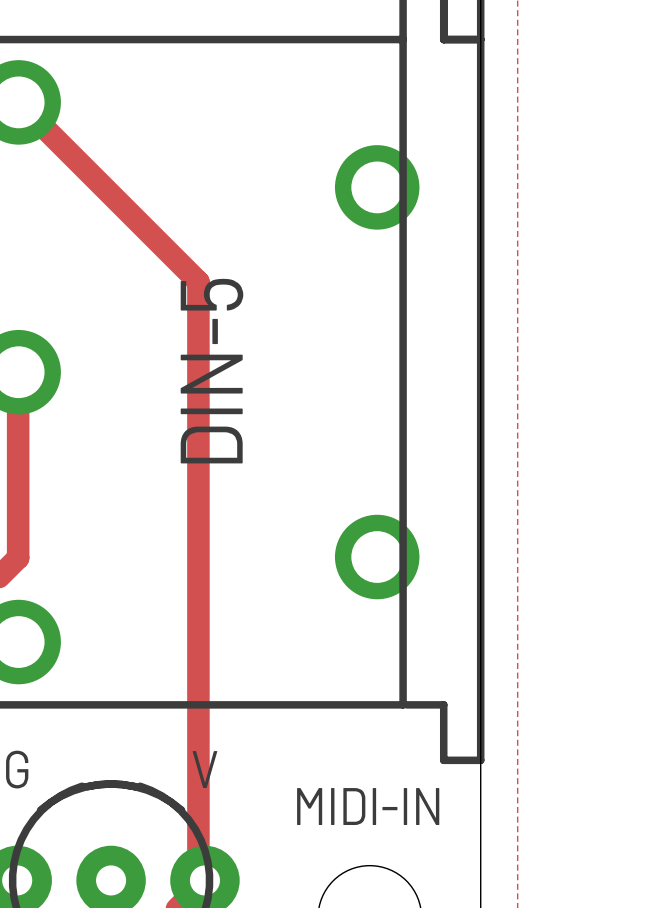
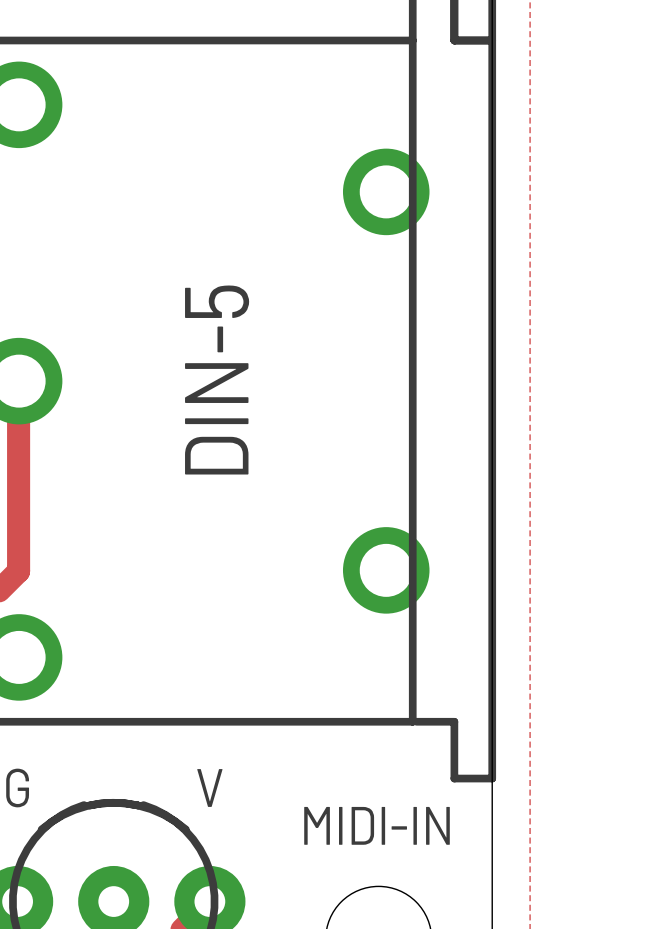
track: (18, 102) (198, 281) (198, 870) (204, 880) -> none

